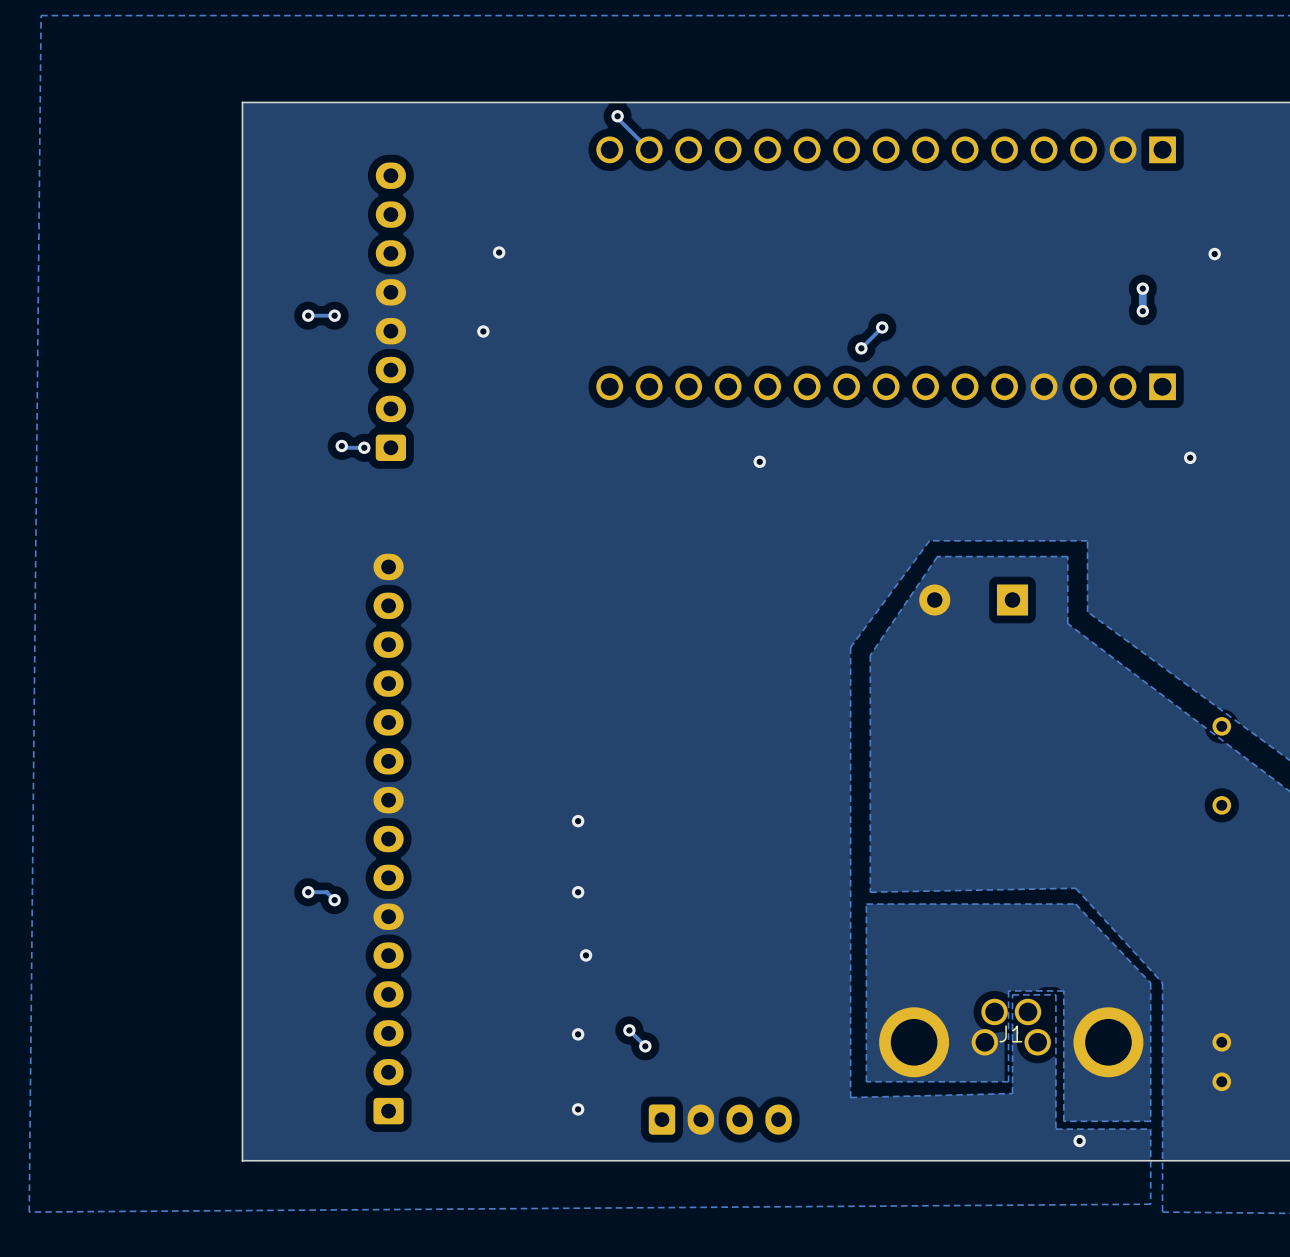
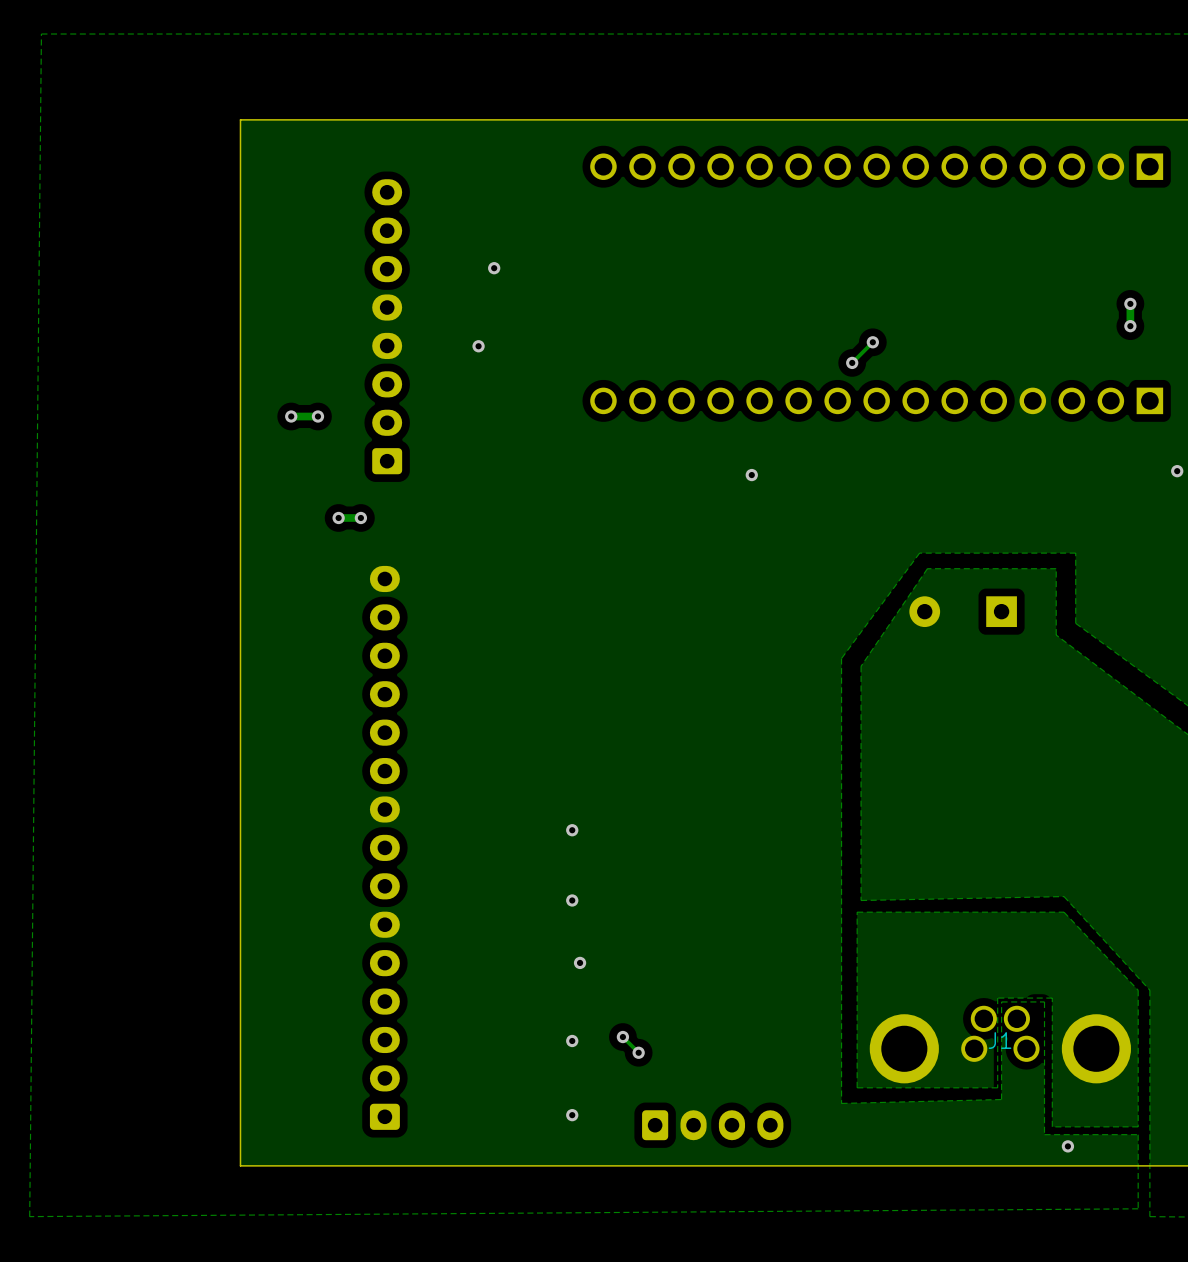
track: (617, 116) (649, 149) -> none
via: (617, 116) -> none
via: (308, 315) -> none
track: (334, 315) (308, 315) -> none
via: (334, 315) -> none
via: none -> (291, 416)
track: none -> (317, 416) (291, 416)
via: none -> (317, 416)
track: (341, 446) (343, 447) (364, 447) -> none
via: (341, 446) -> none
via: (364, 447) -> none
via: none -> (338, 517)
track: none -> (360, 517) (338, 517)
via: none -> (360, 517)
track: (308, 892) (326, 892) (334, 900) -> none
via: (308, 892) -> none
via: (334, 900) -> none

